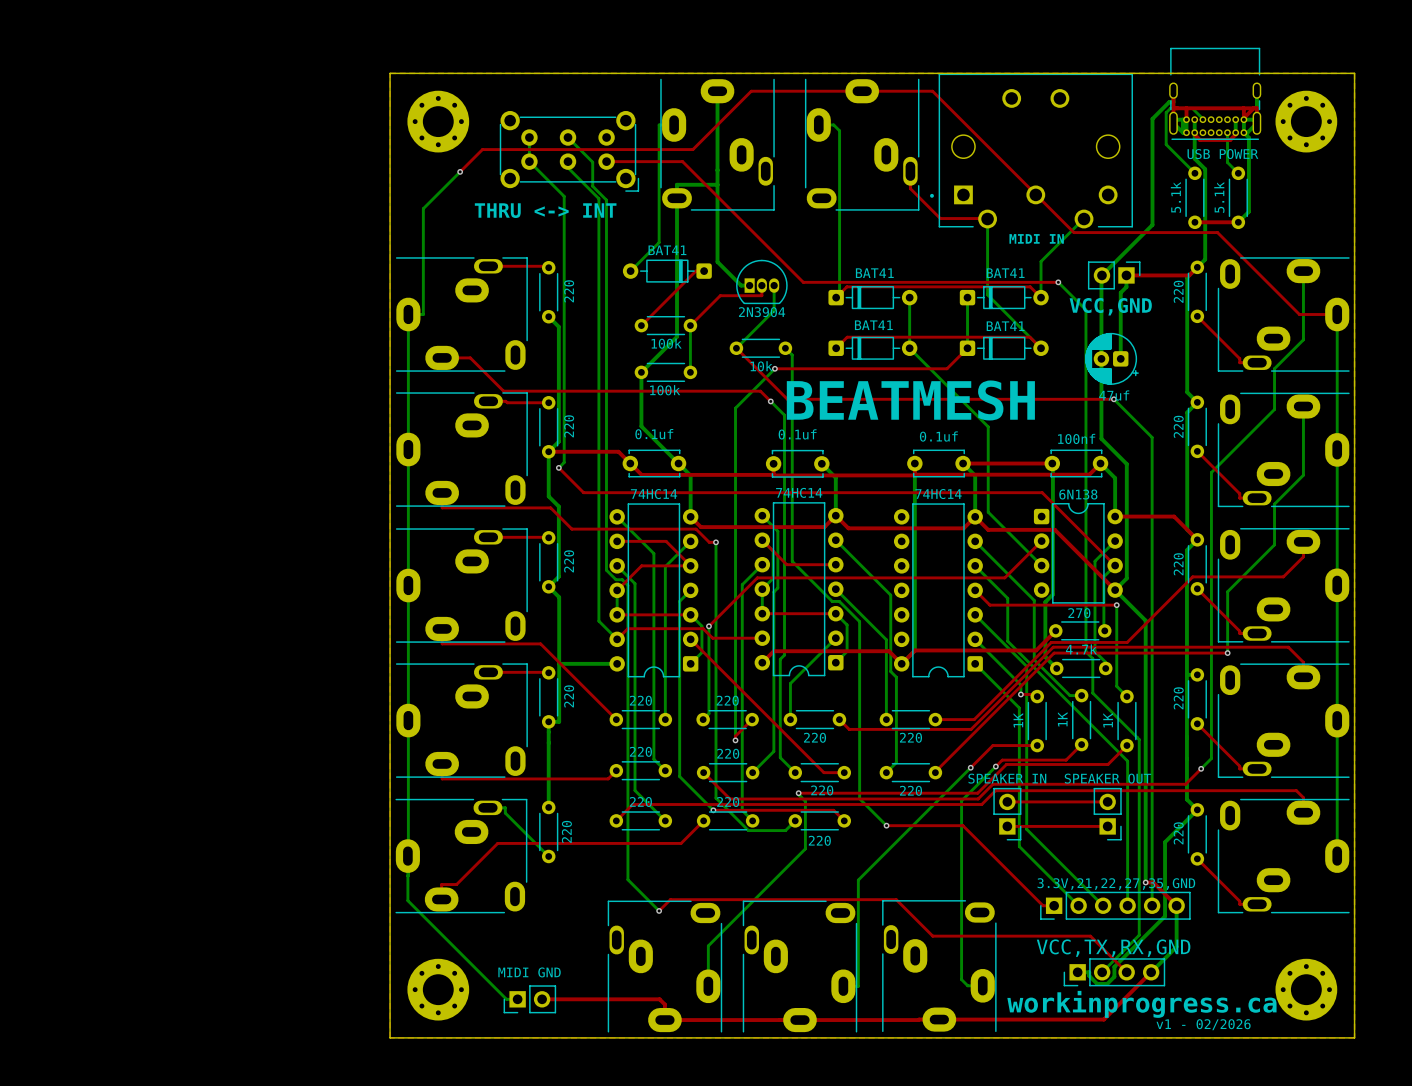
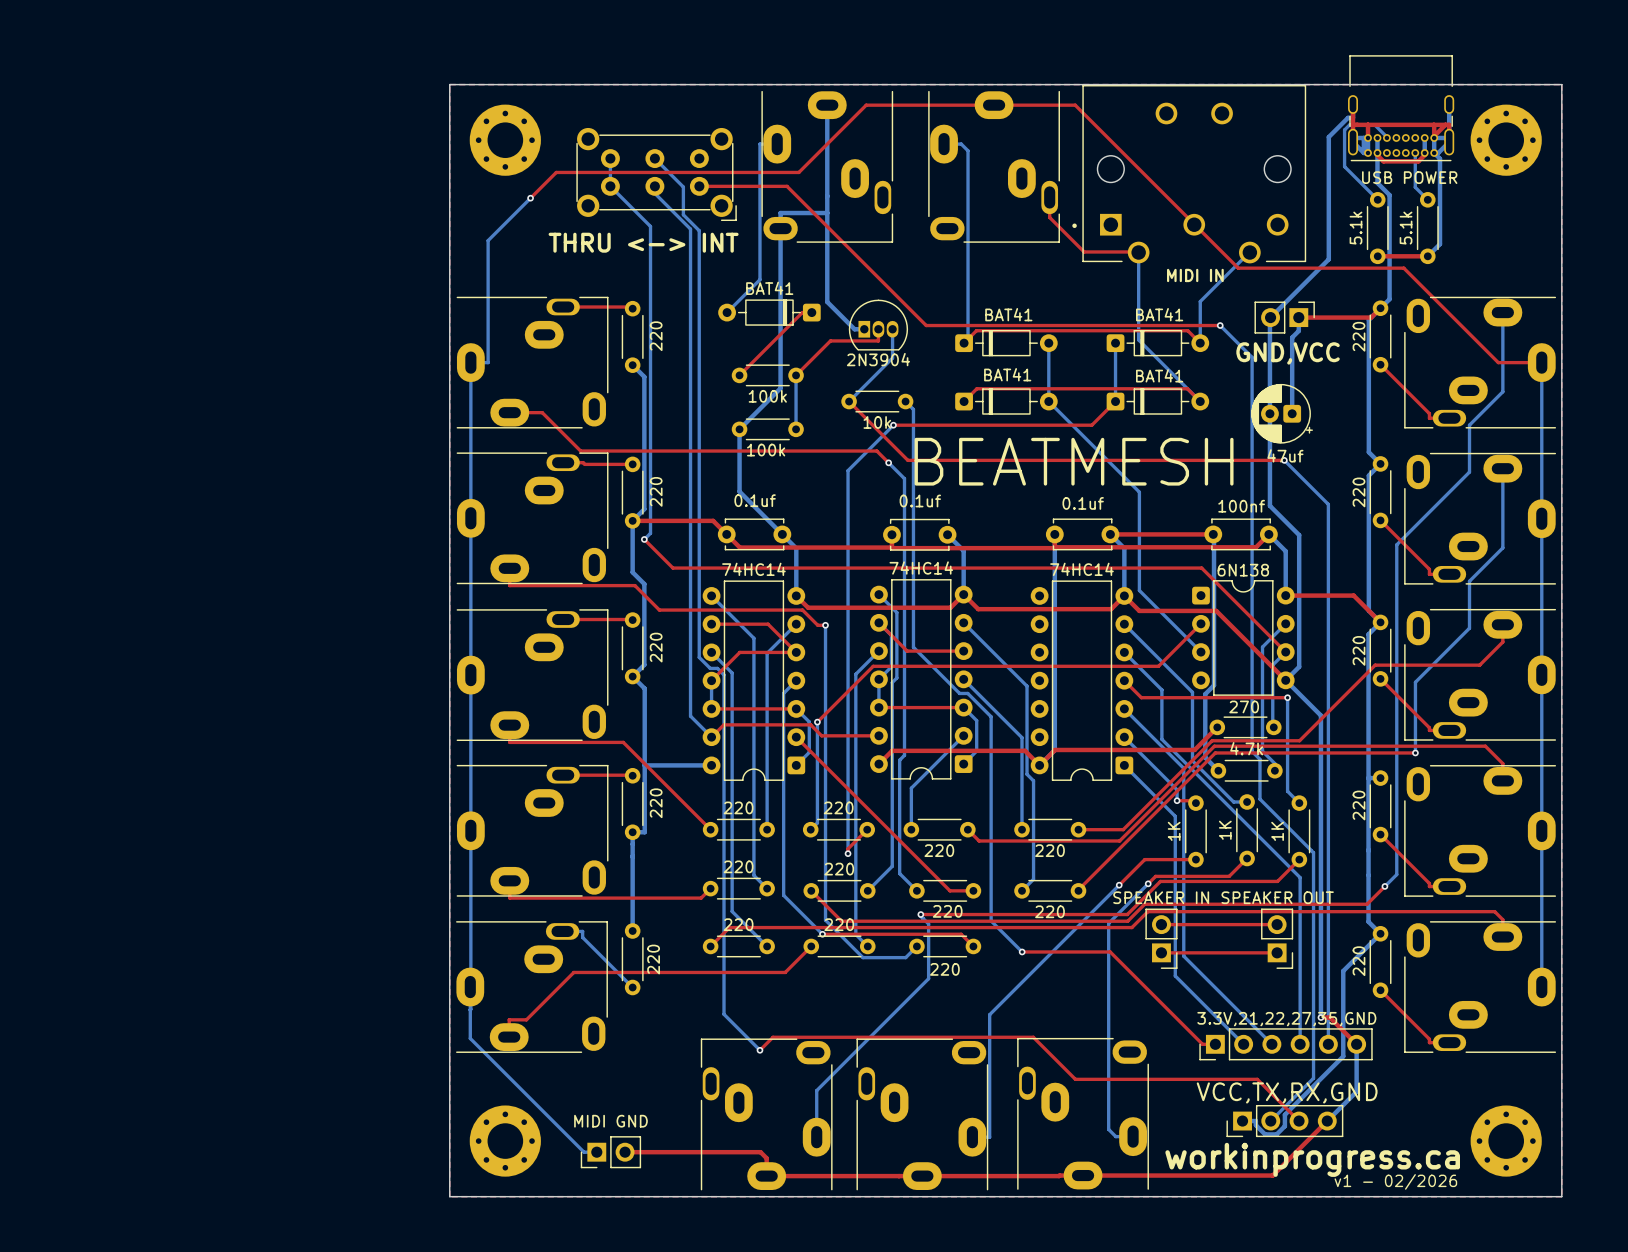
text: VCC,GND (1110, 306) -> GND,VCC (1288, 353)

